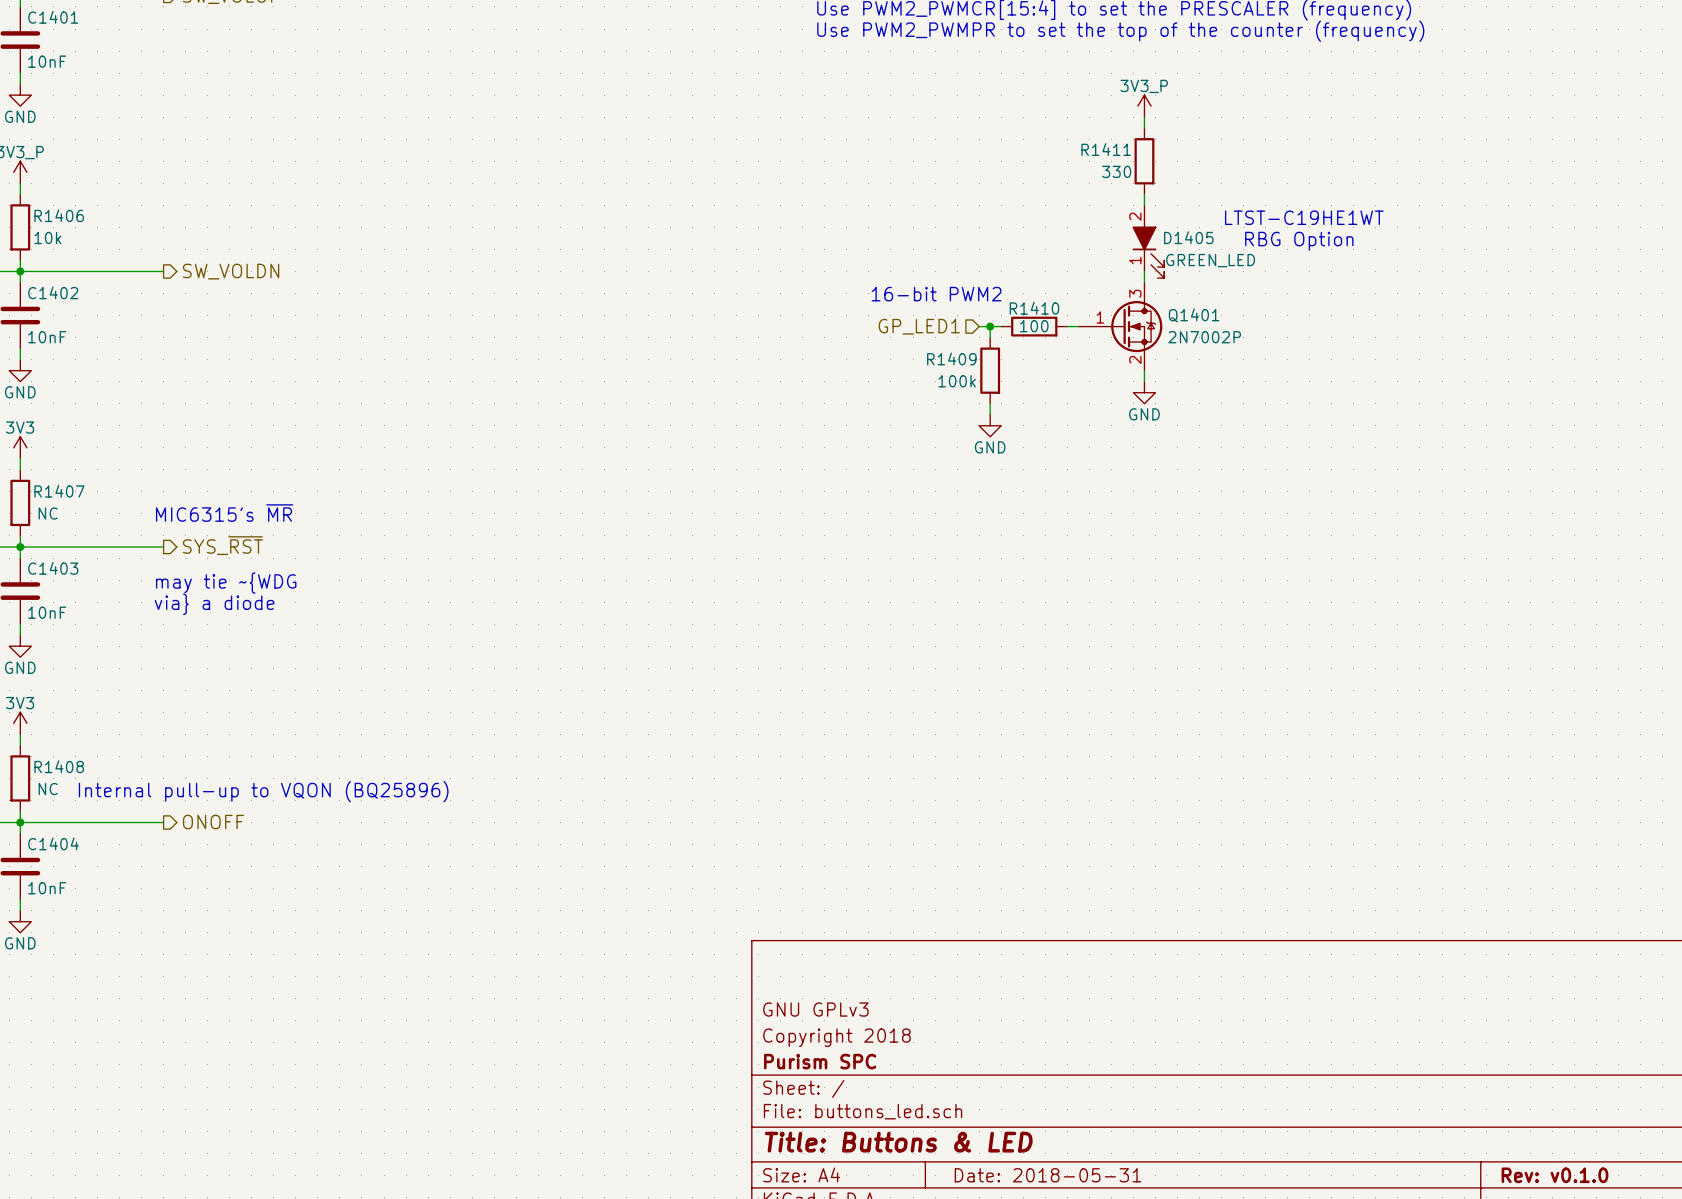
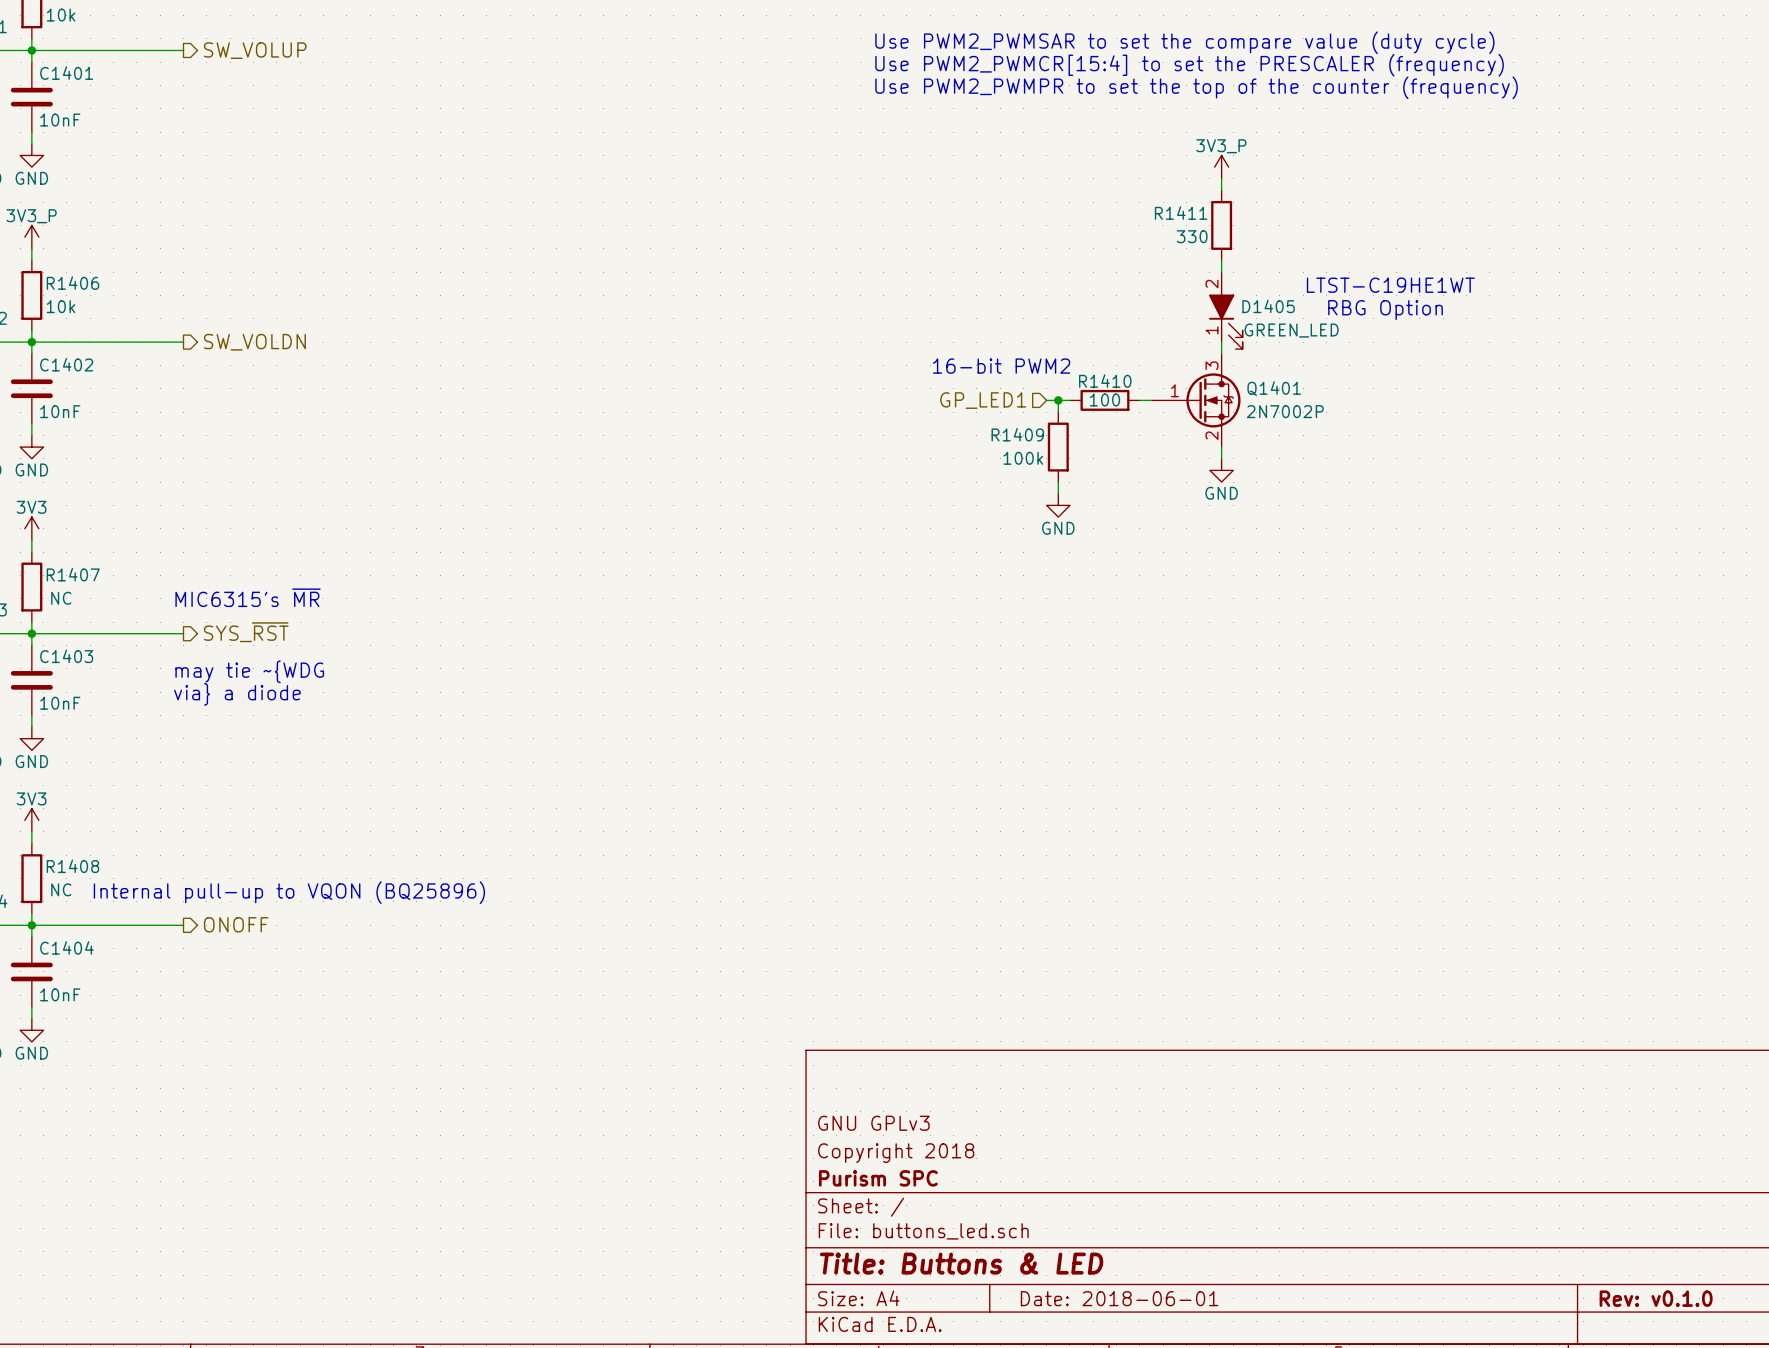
title block: Date: 2018-05-31 (1048, 1175) -> Date: 2018-06-01 (1119, 1298)

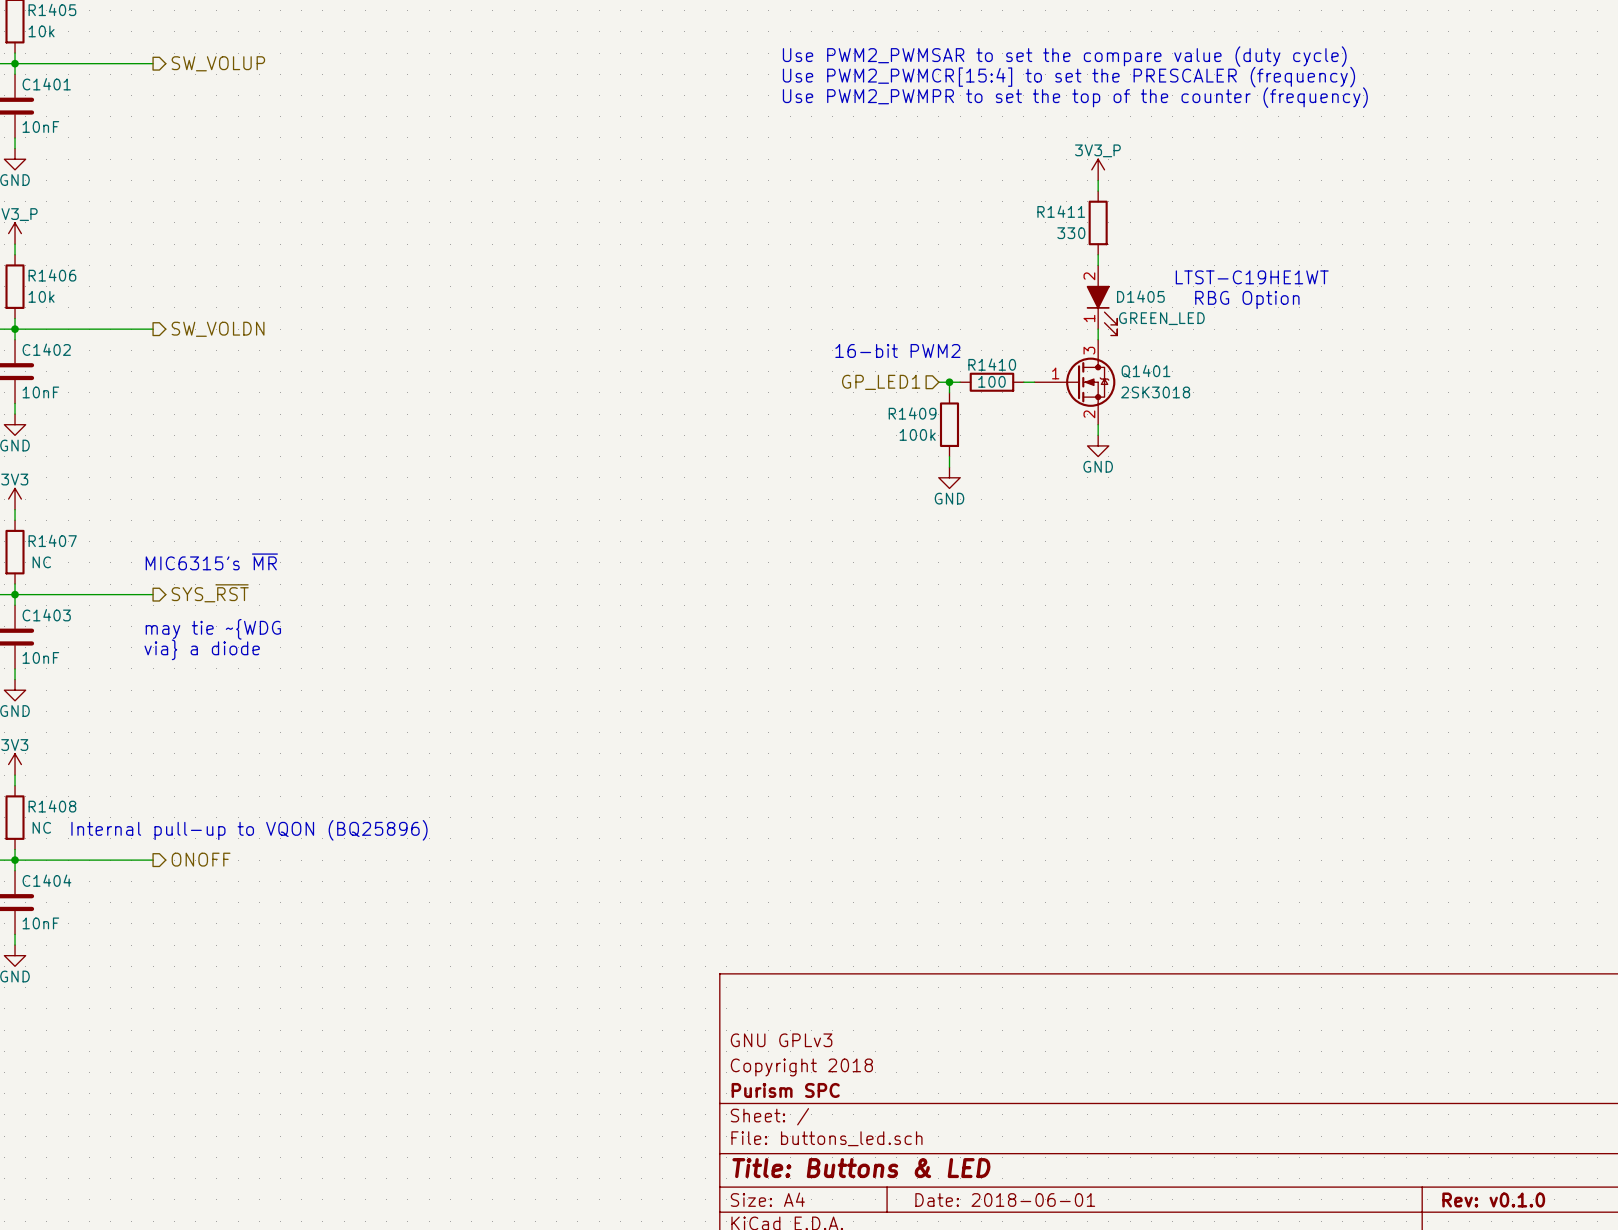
Q1401 value: 2N7002P (1285, 411) -> 2SK3018 (1155, 392)

